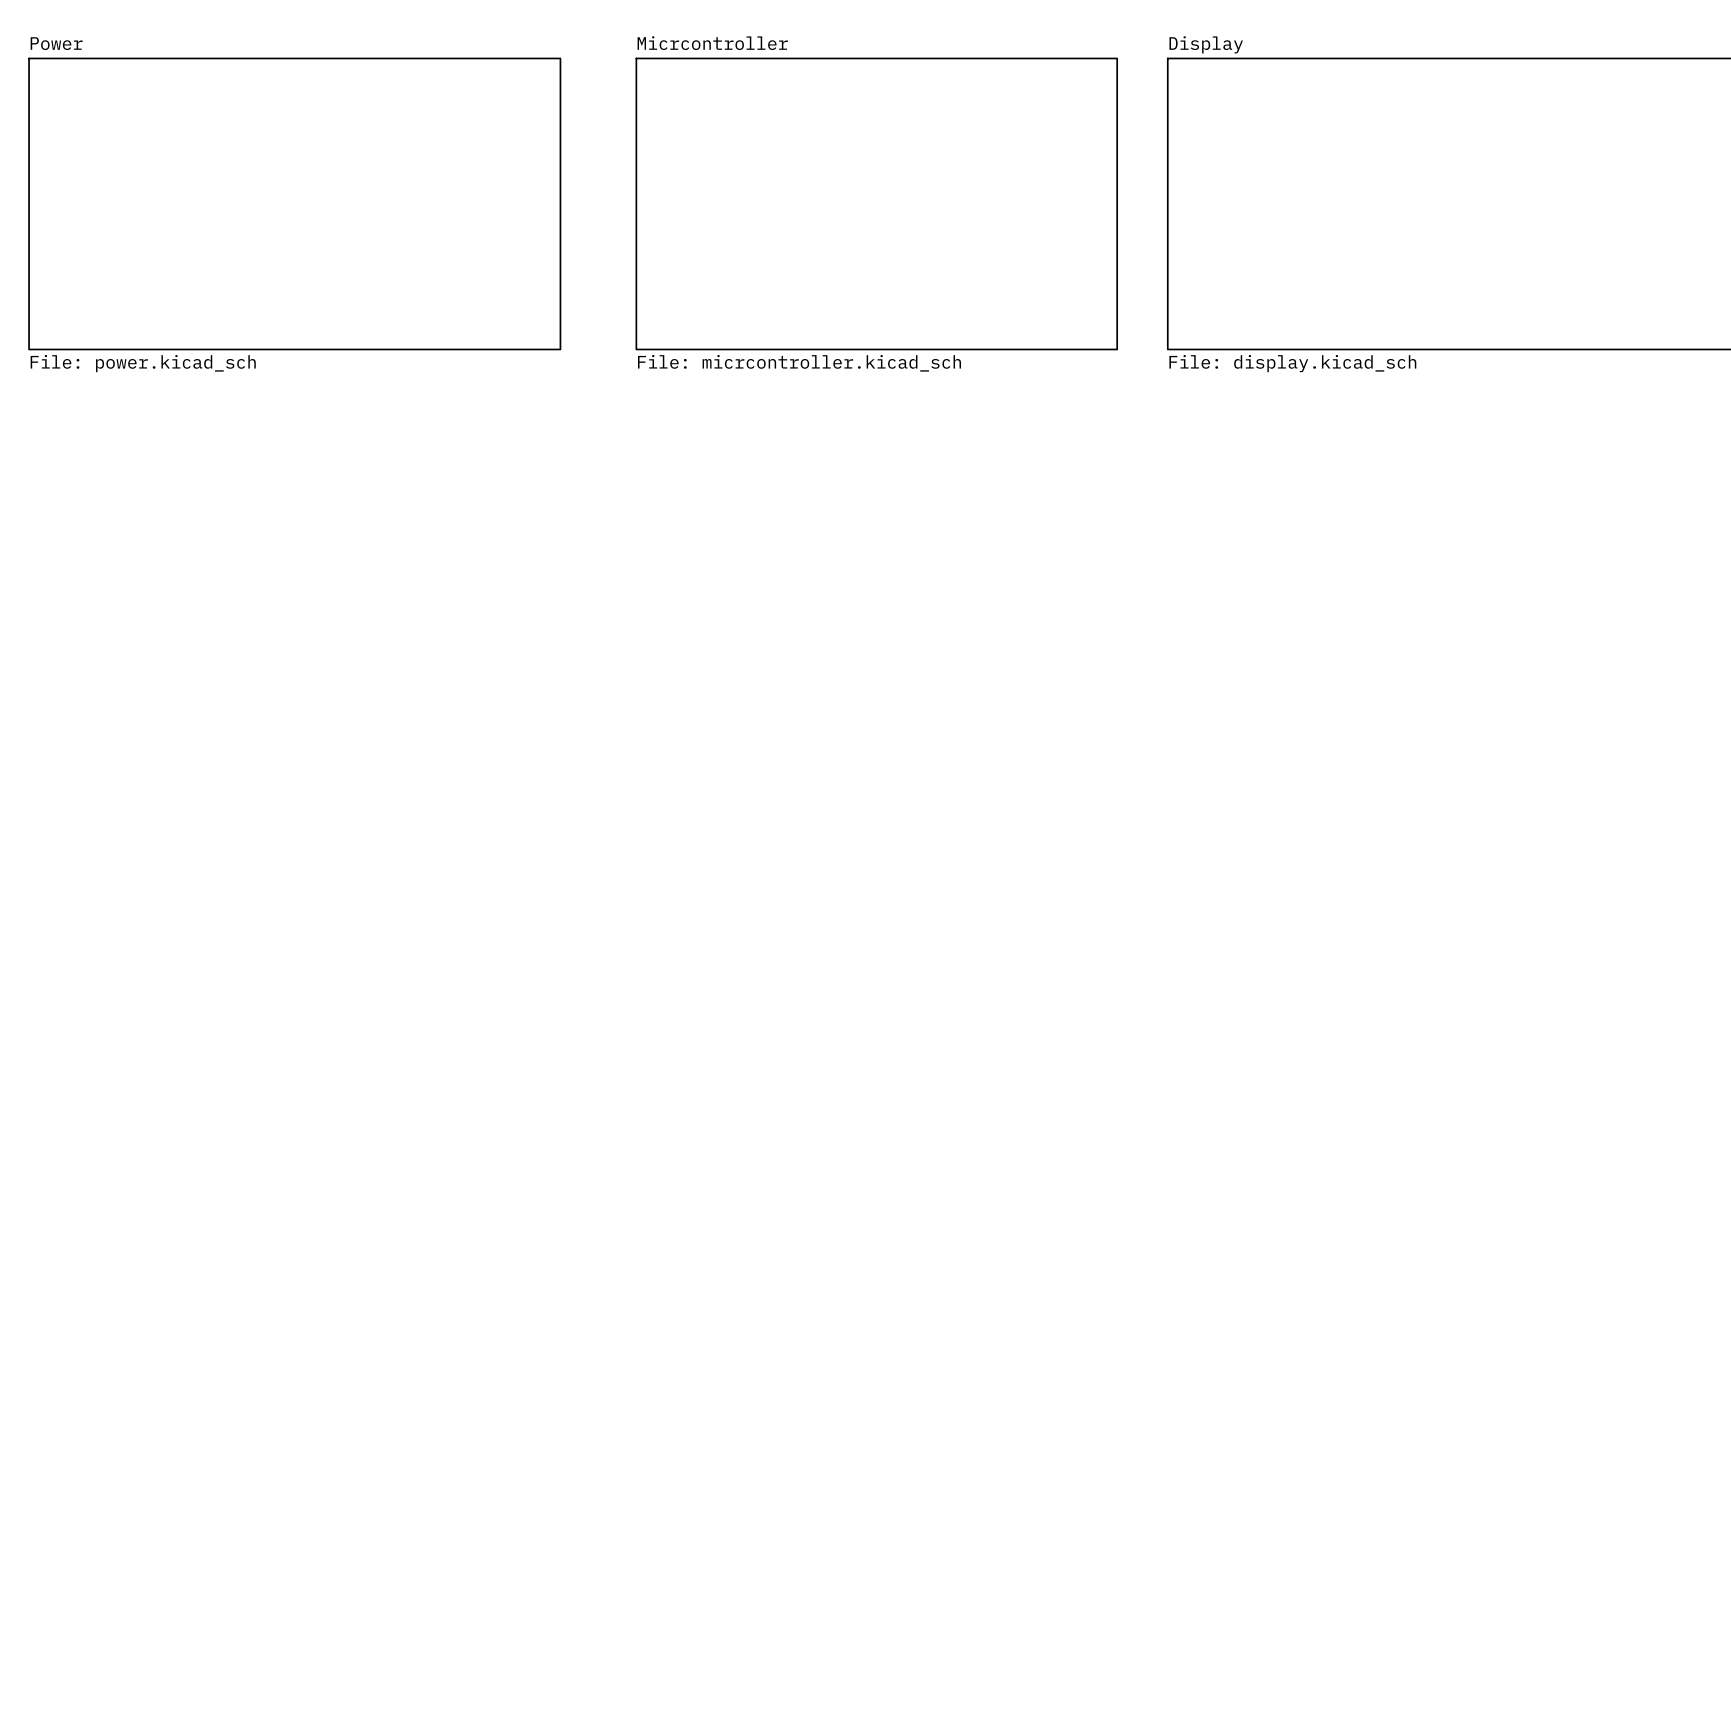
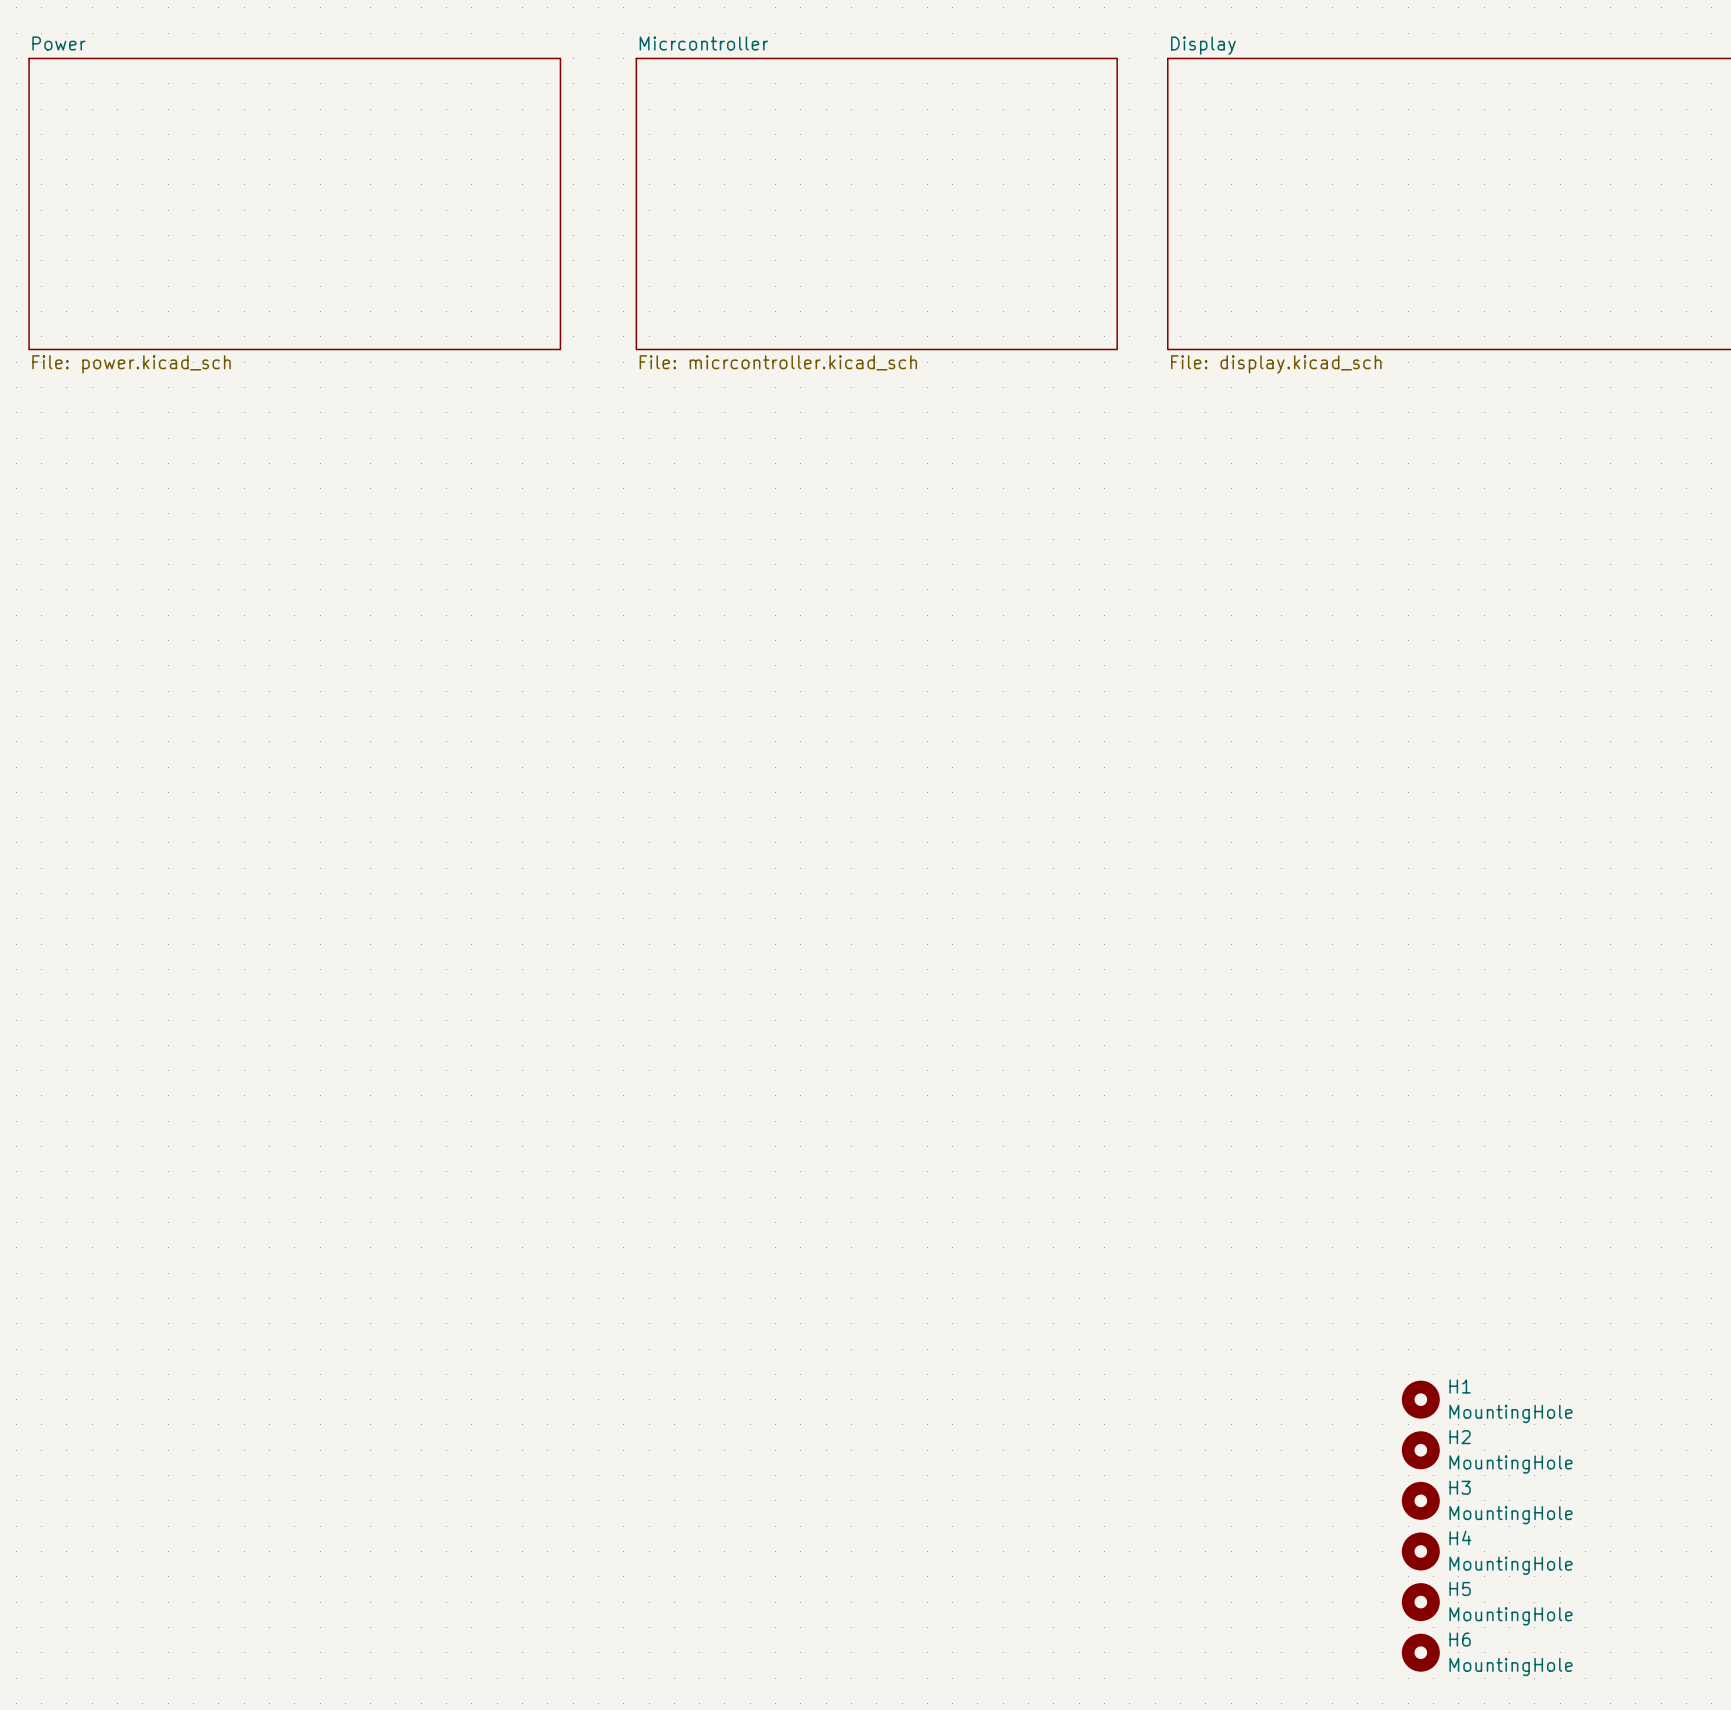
H1: none -> MountingHole (1420, 1399)
H2: none -> MountingHole (1420, 1450)
H3: none -> MountingHole (1420, 1500)
H4: none -> MountingHole (1420, 1551)
H5: none -> MountingHole (1420, 1602)
H6: none -> MountingHole (1420, 1652)

